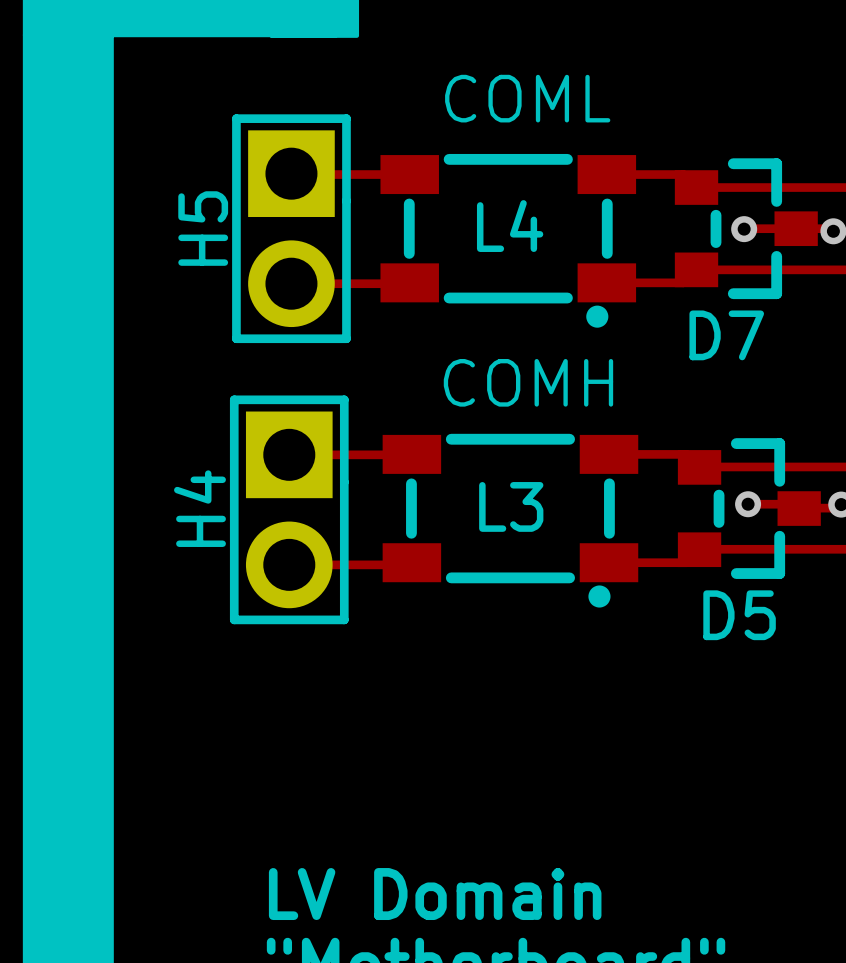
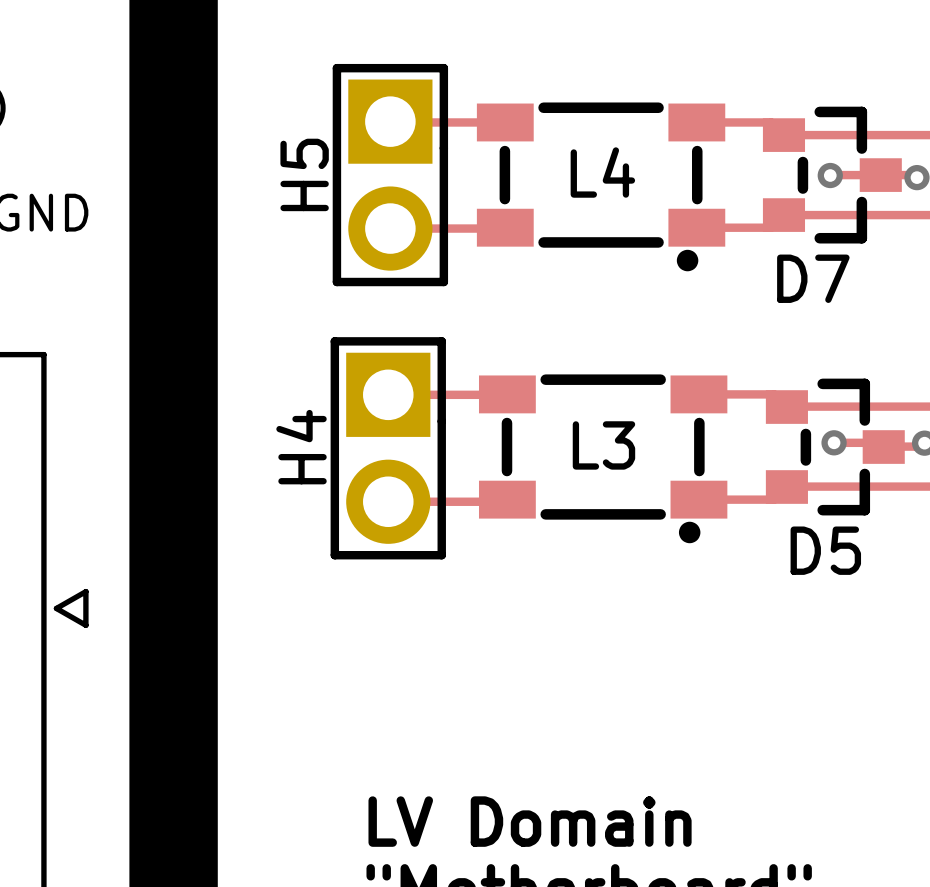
text: COML (527, 98) -> none
text: COMH (528, 382) -> none

